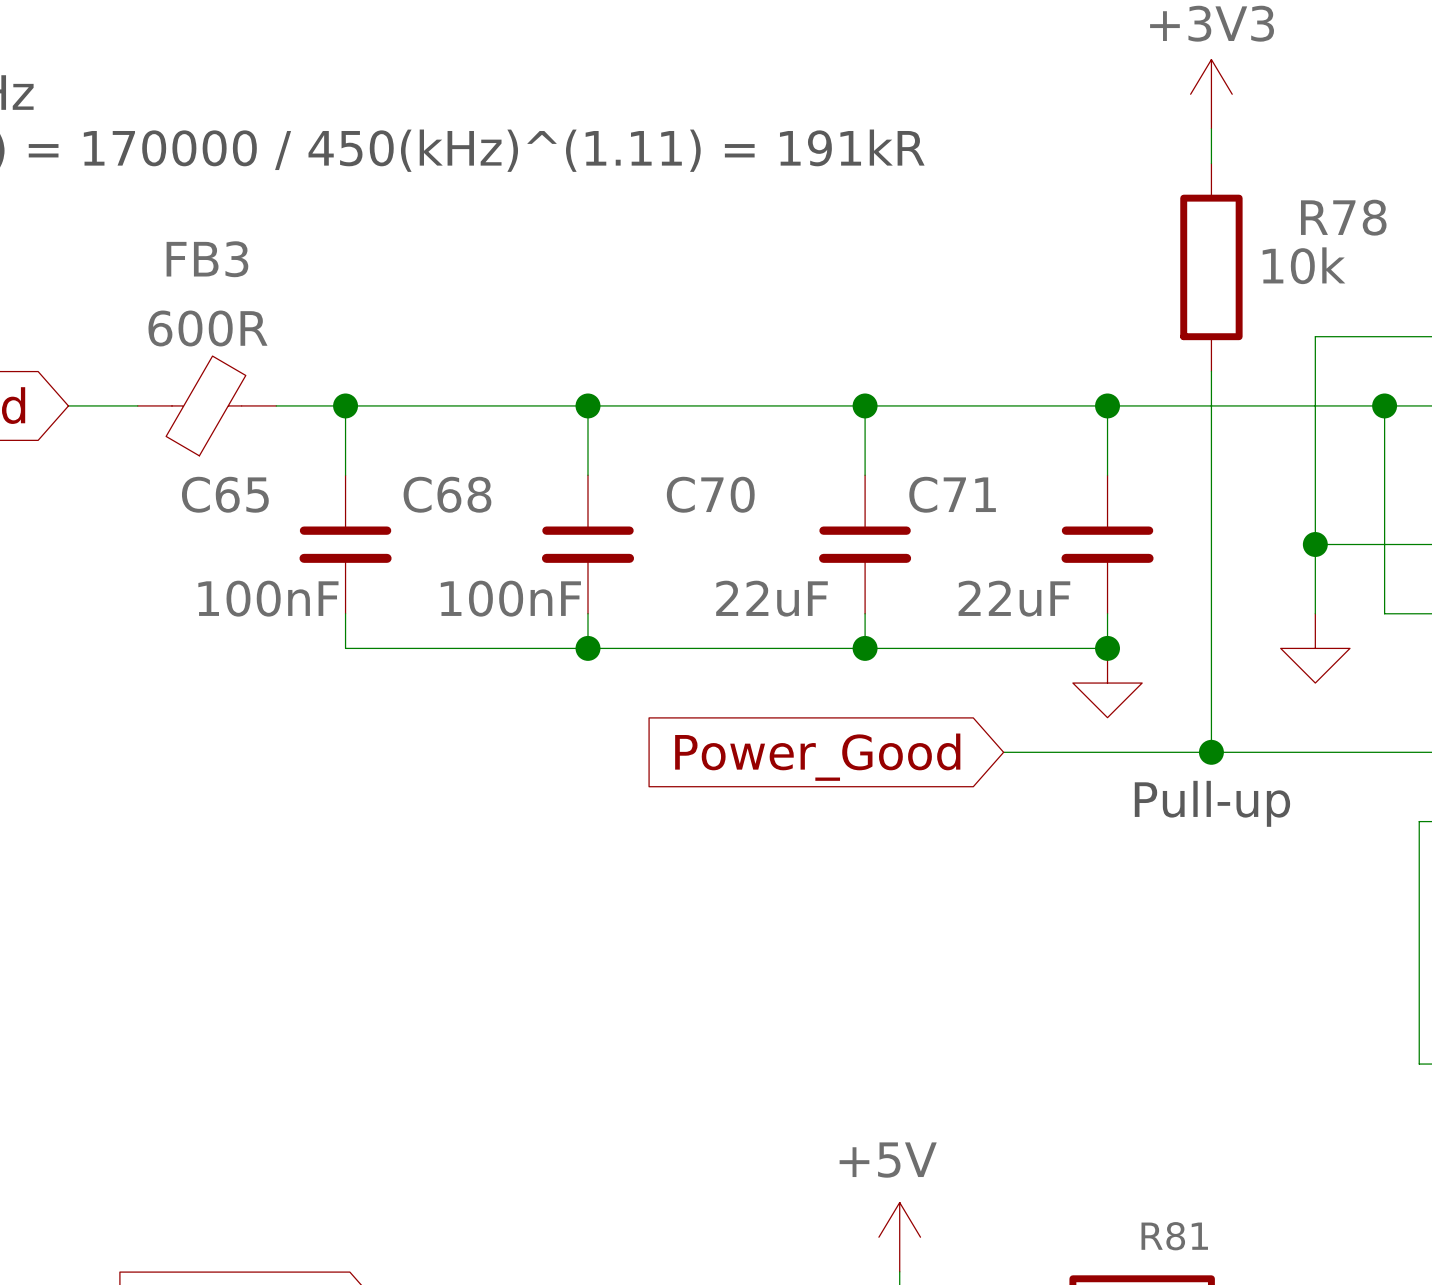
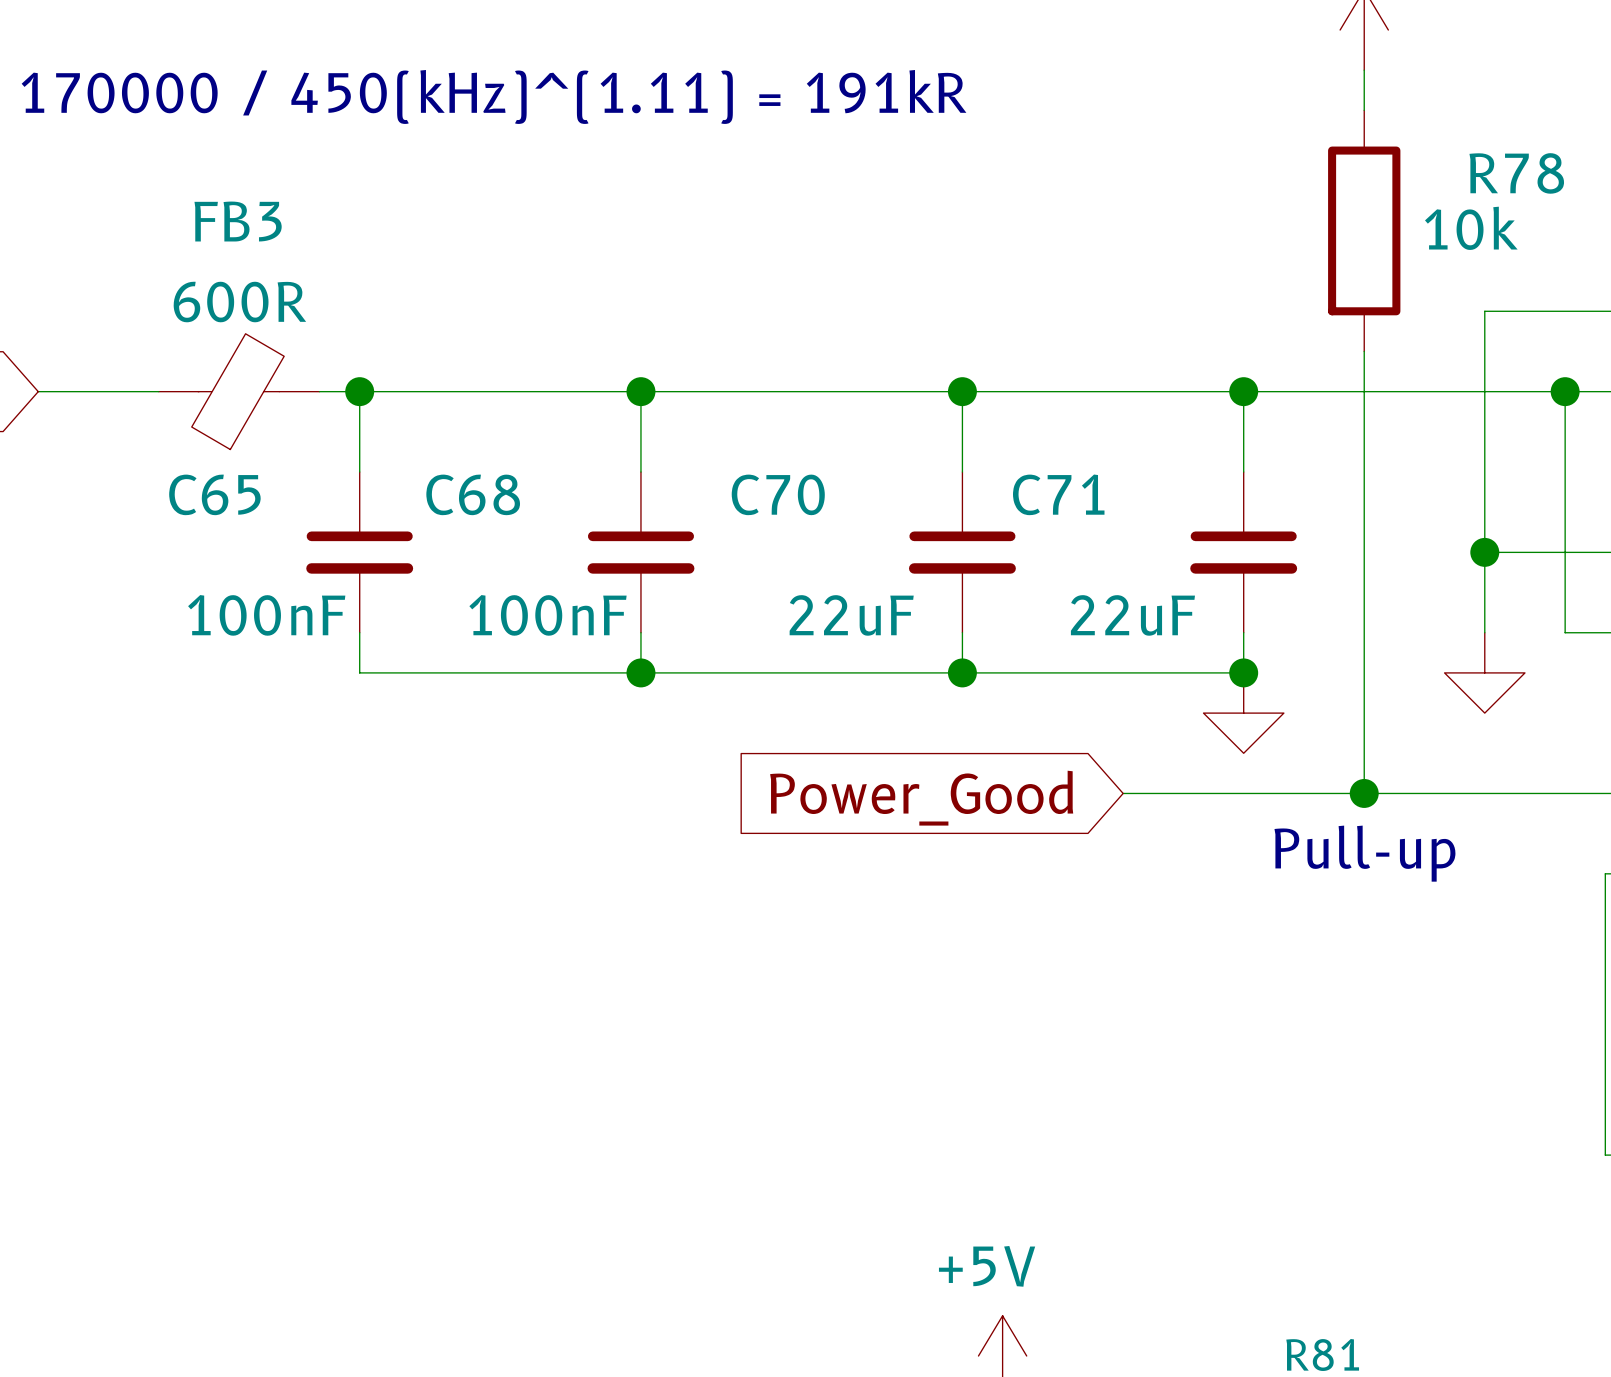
FB3 position: (207, 405) -> (239, 391)

